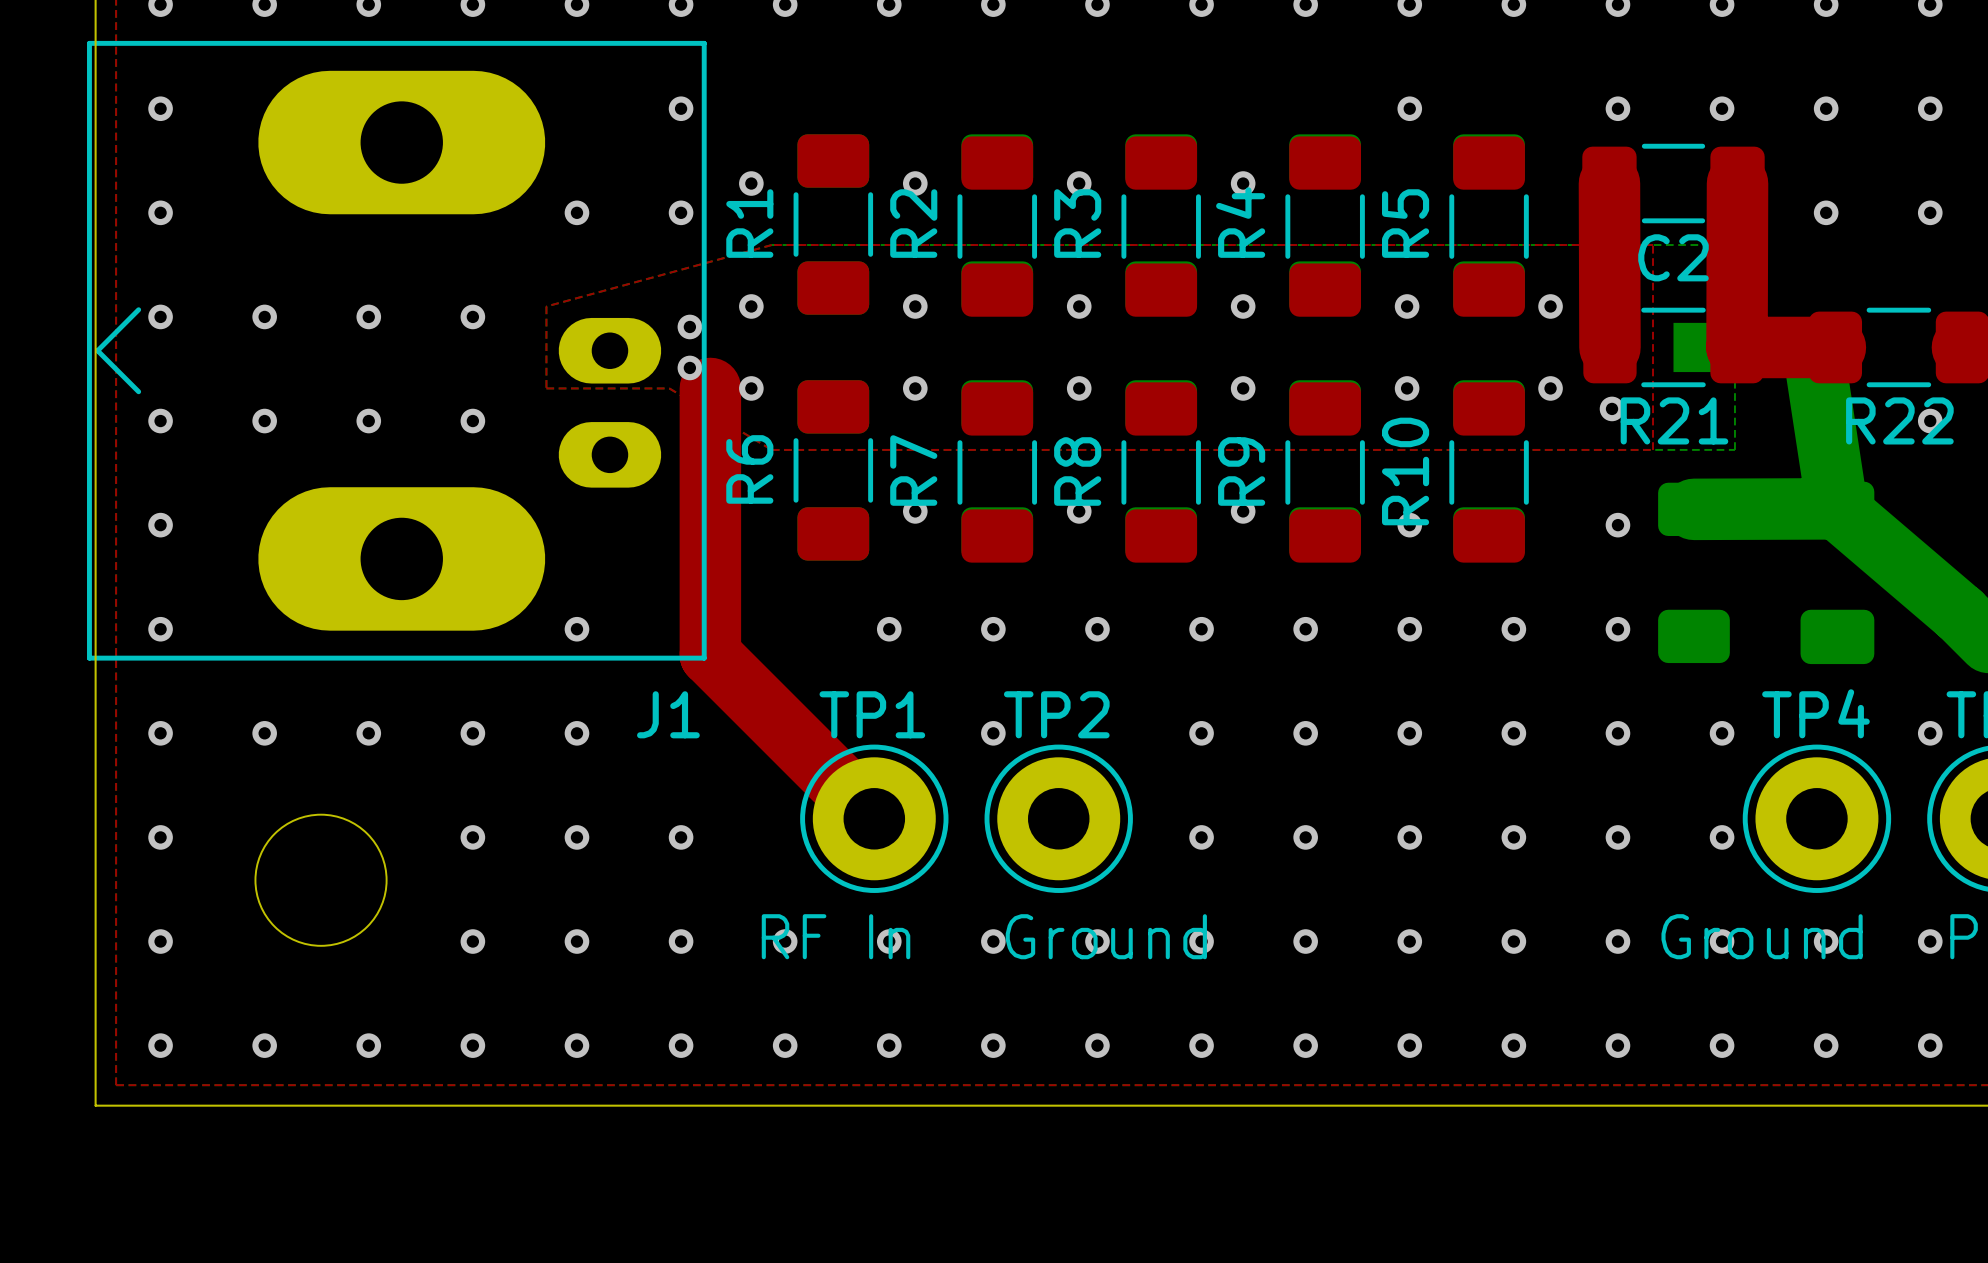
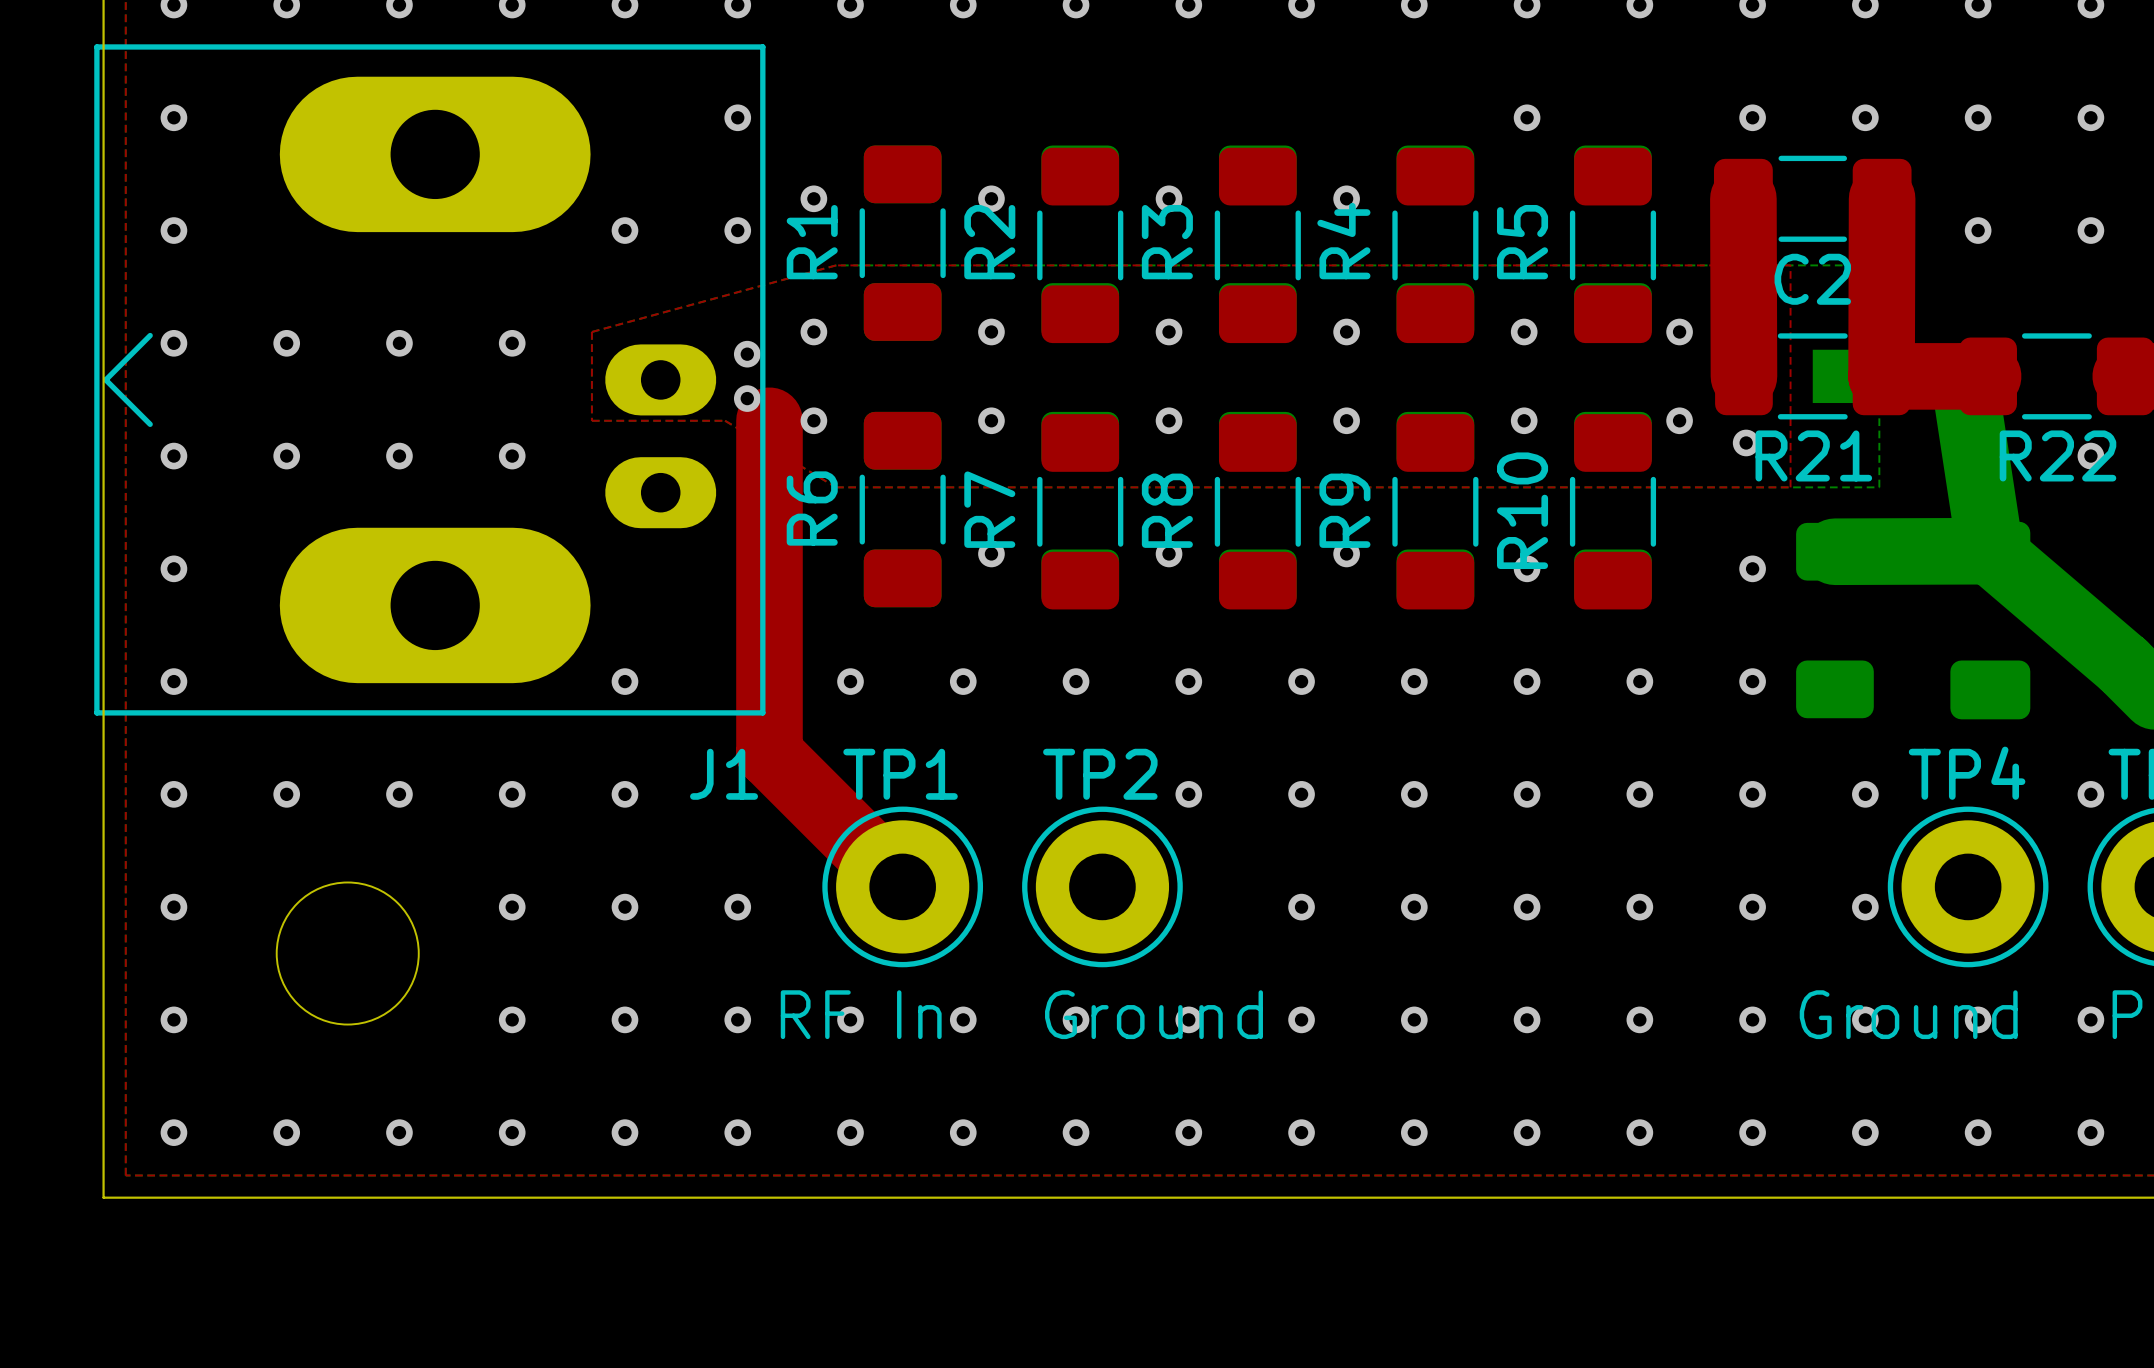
via: none -> (850, 681)
top track: (710, 654) (874, 818) -> (769, 709) (769, 753) (902, 886)
via position: (993, 733) -> (1188, 794)
TP1 position: (874, 818) -> (902, 886)
TP2 position: (1058, 818) -> (1102, 886)
text position: RF In (836, 936) -> RF In (861, 1014)
text position: Ground (1106, 936) -> Ground (1153, 1014)

